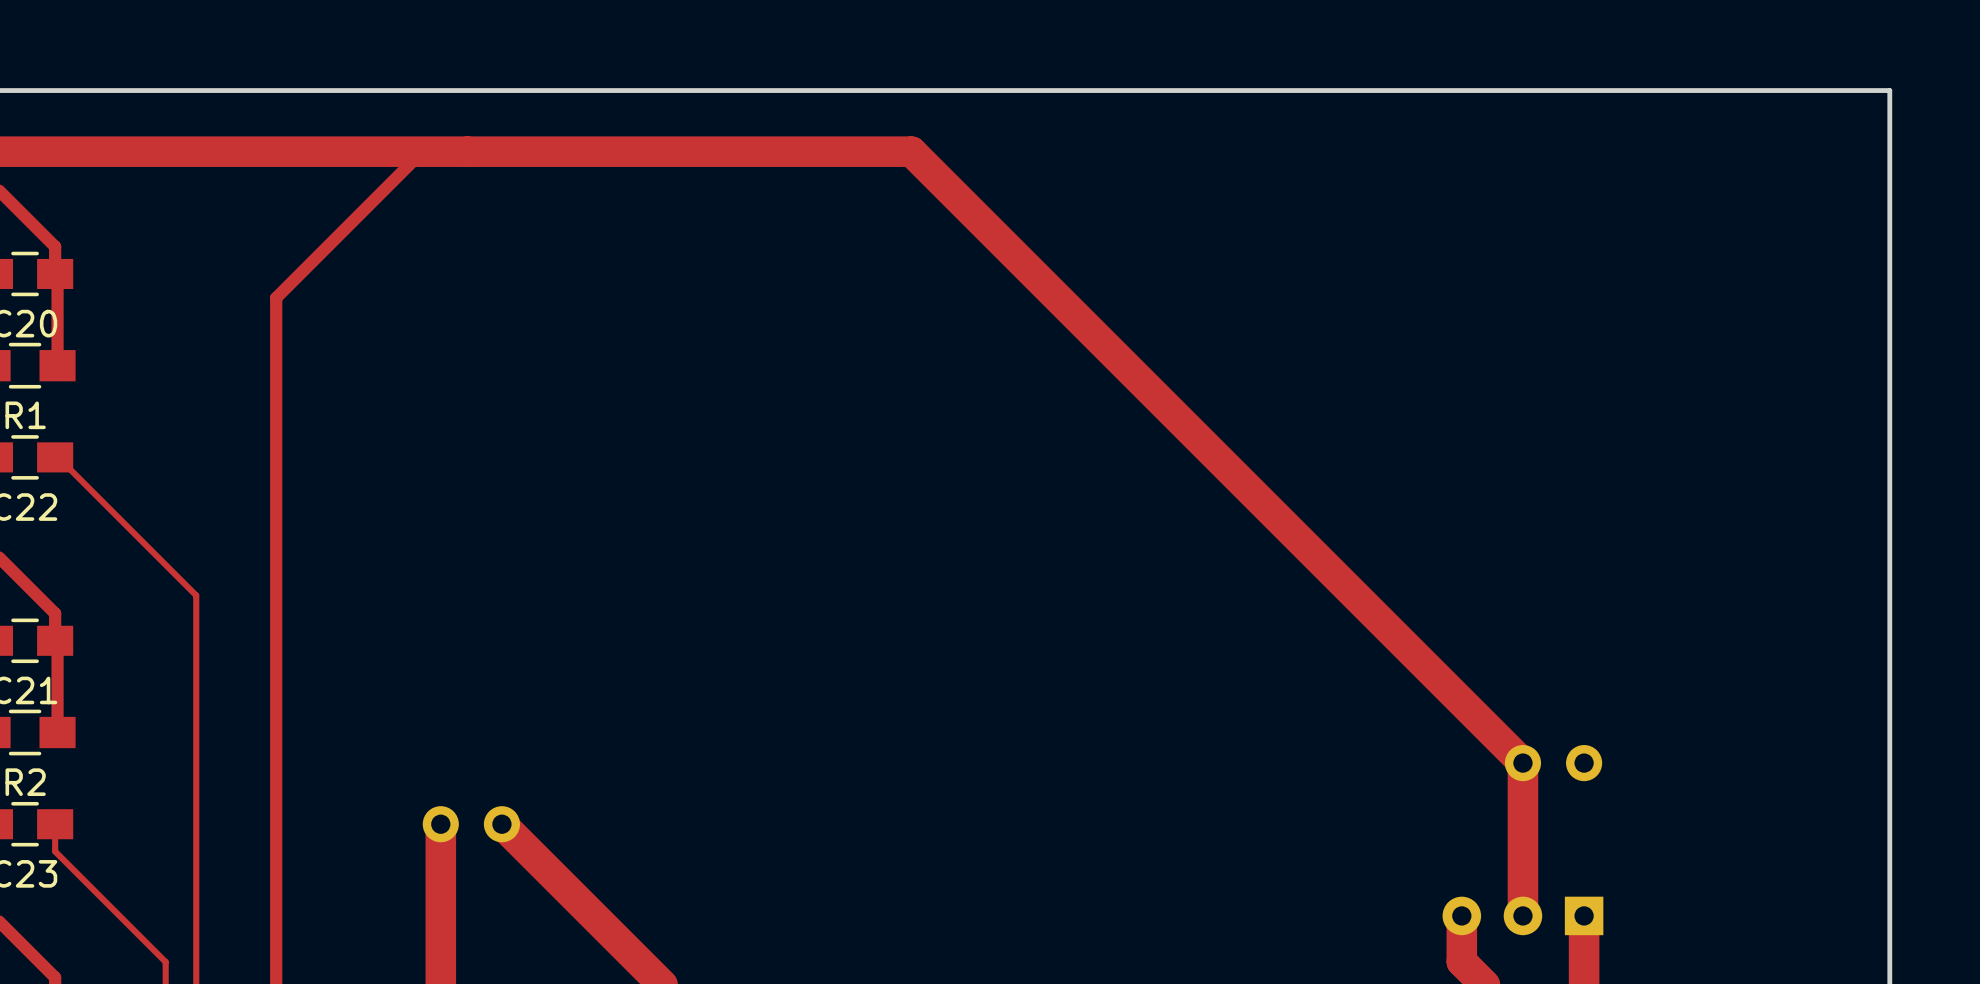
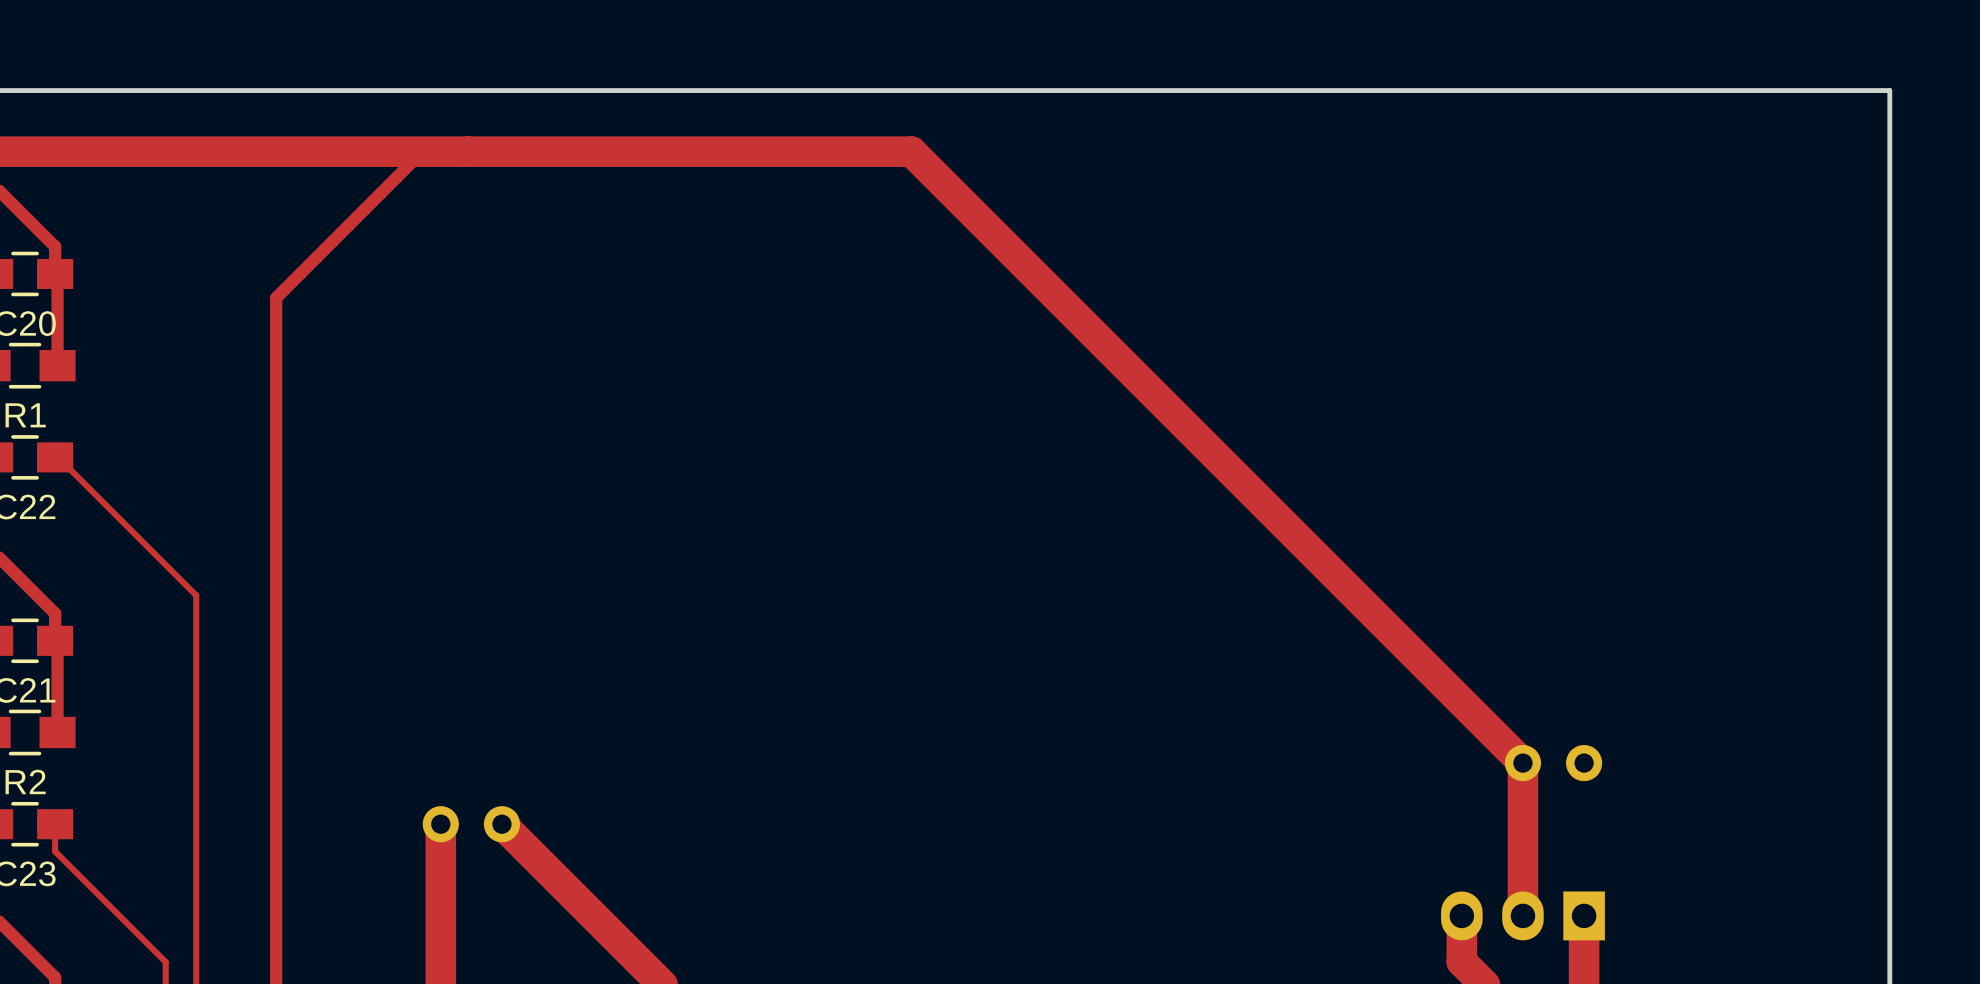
part footprint: [1442, 896, 1604, 936] -> [1441, 891, 1605, 941]

